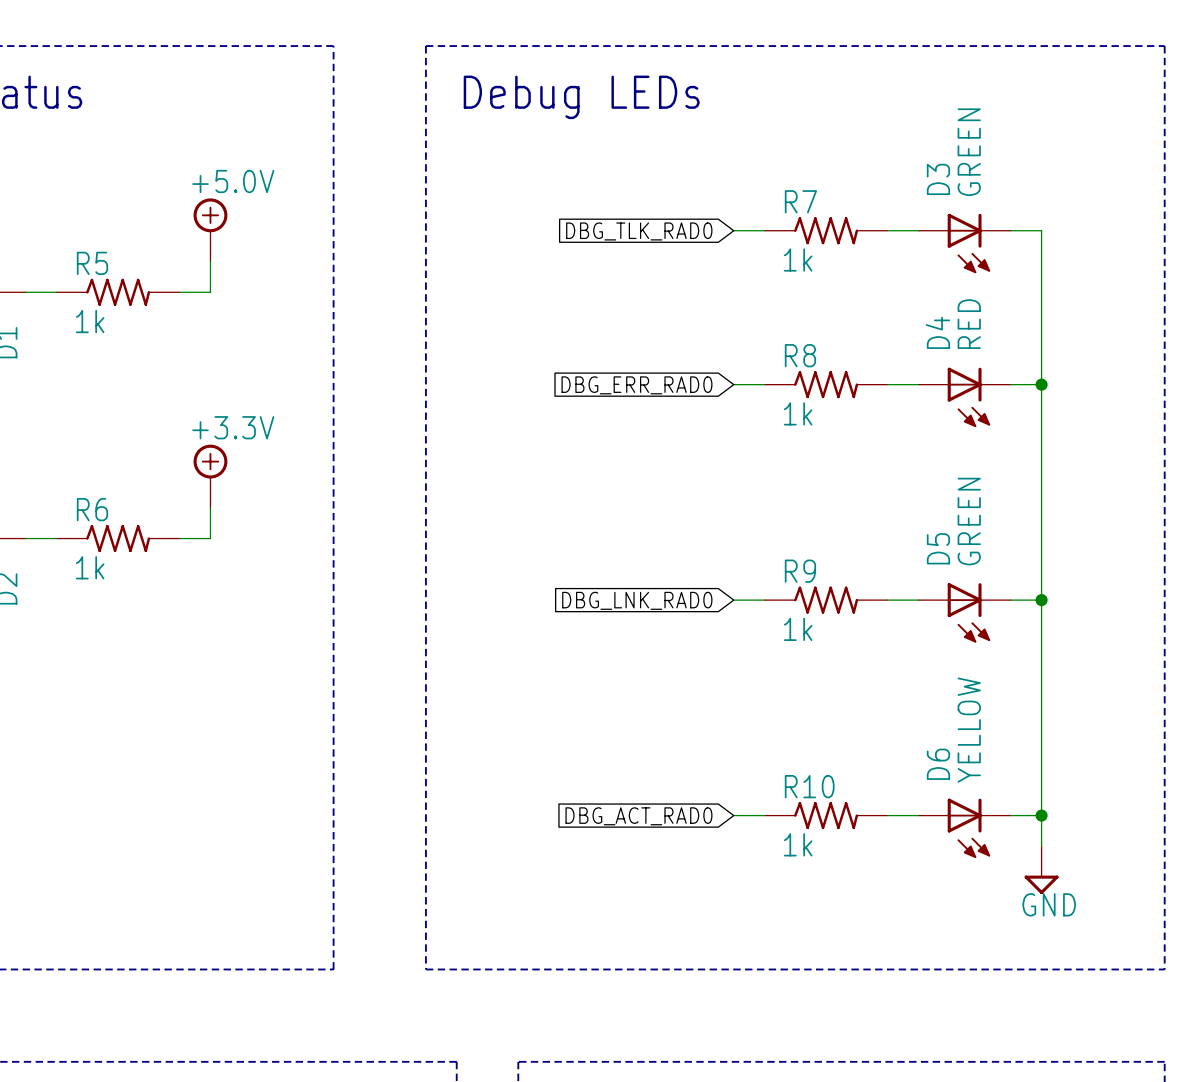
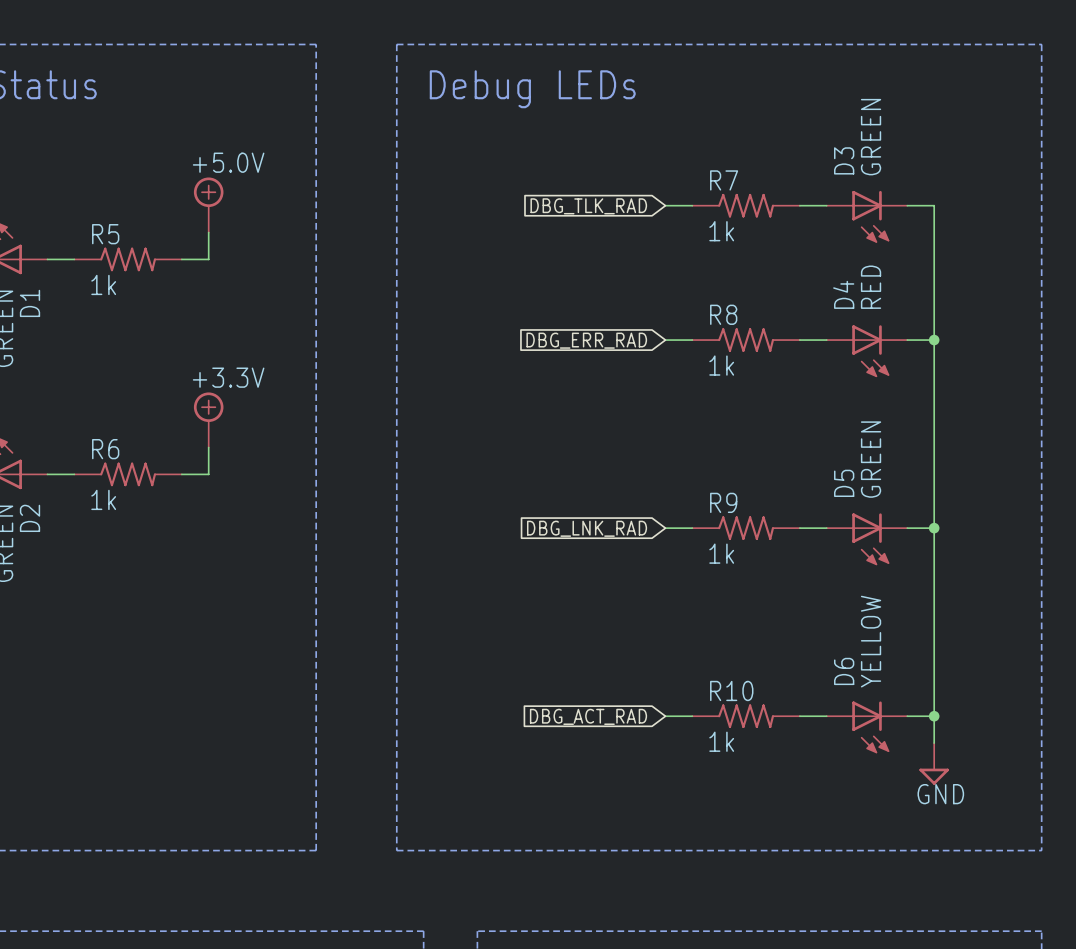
global label: DBG_TLK_RAD0 (639, 231) -> DBG_TLK_RAD (588, 206)
global label: DBG_ERR_RAD0 (636, 385) -> DBG_ERR_RAD (586, 340)
global label: DBG_LNK_RAD0 (637, 600) -> DBG_LNK_RAD (587, 528)
global label: DBG_ACT_RAD0 (638, 816) -> DBG_ACT_RAD (588, 716)

